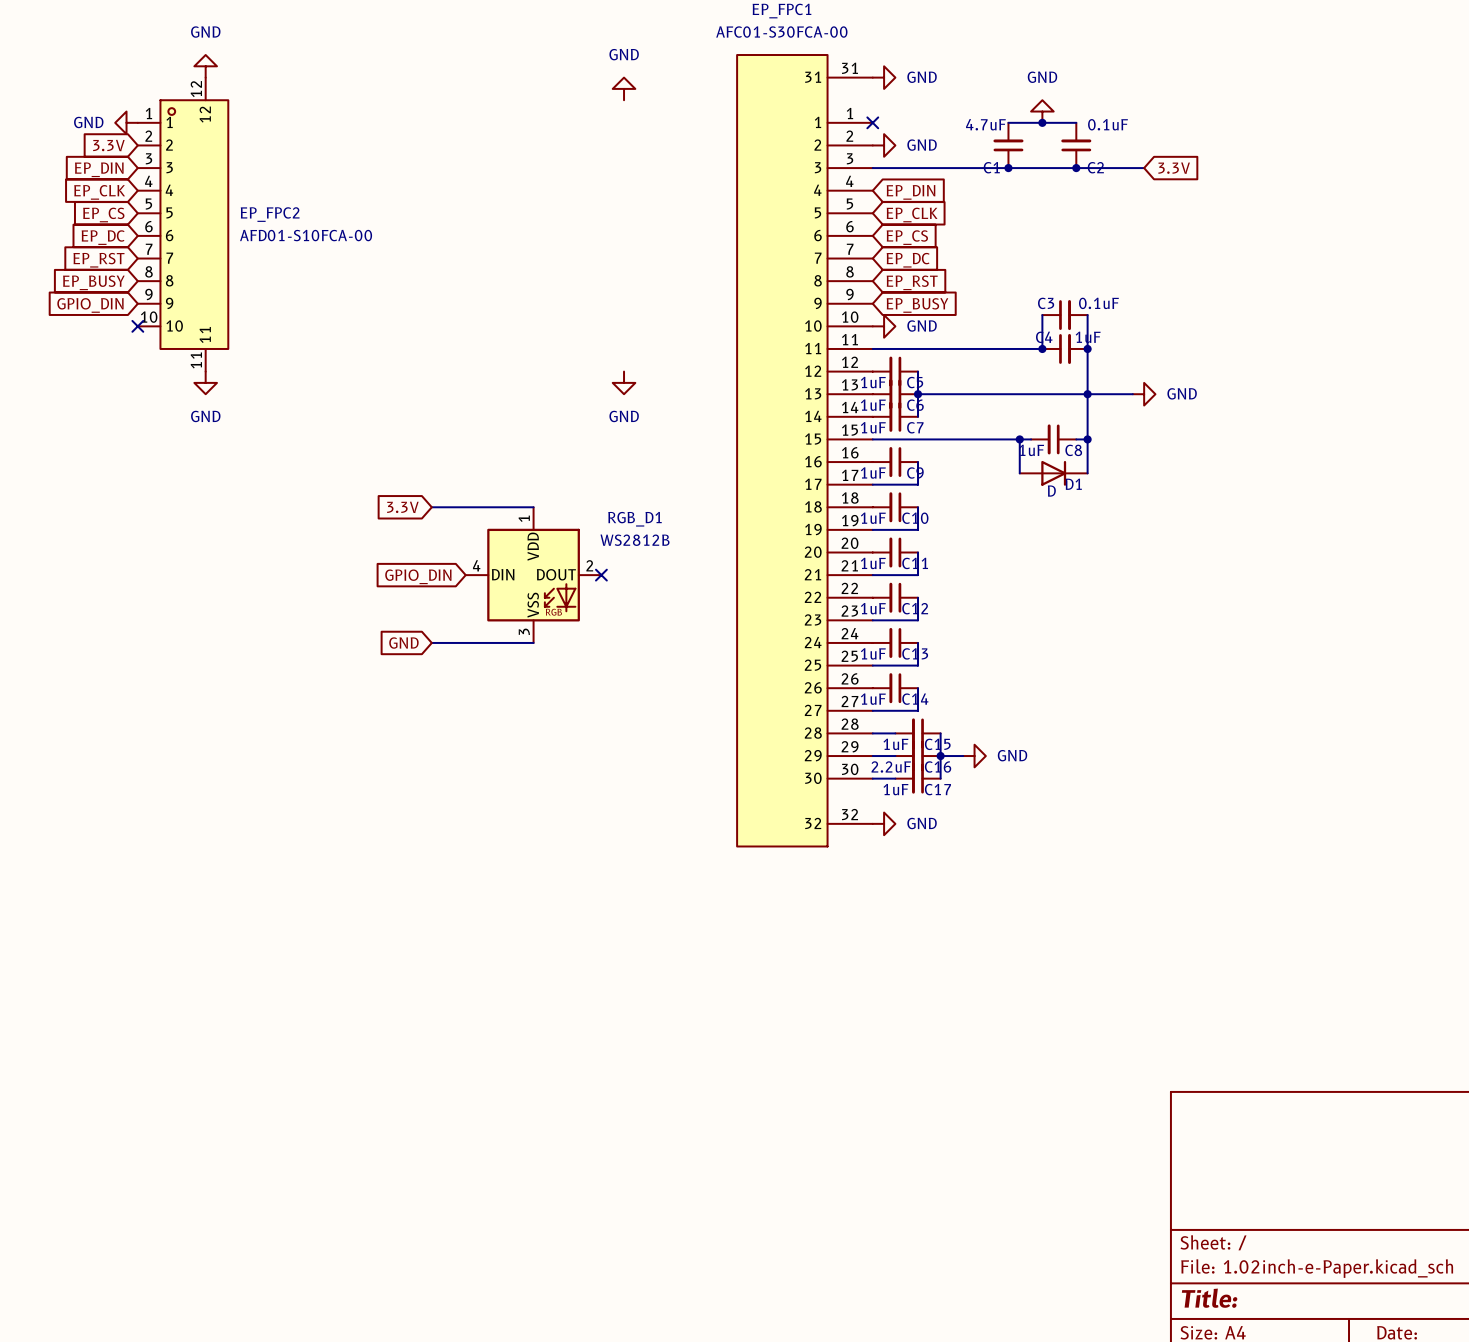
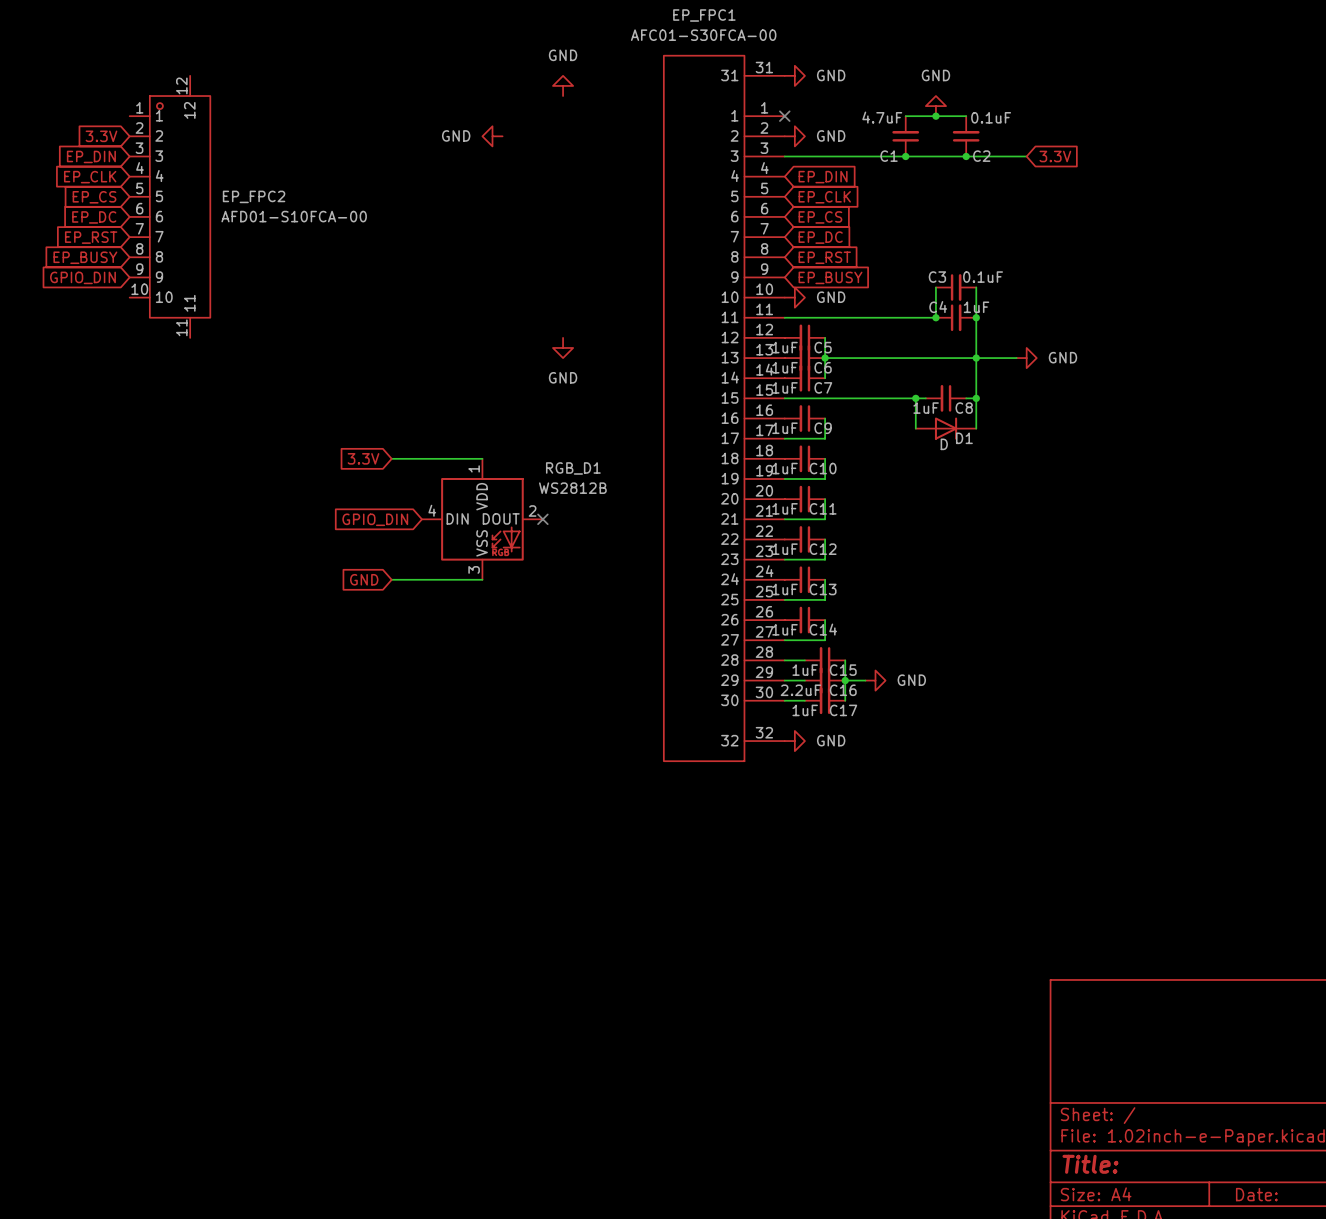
power symbol: GND (205, 66) -> none
power symbol: GND (126, 122) -> none
power symbol: none -> GND (492, 136)
no-connect mark: (137, 326) -> none
power symbol: GND (205, 382) -> none

